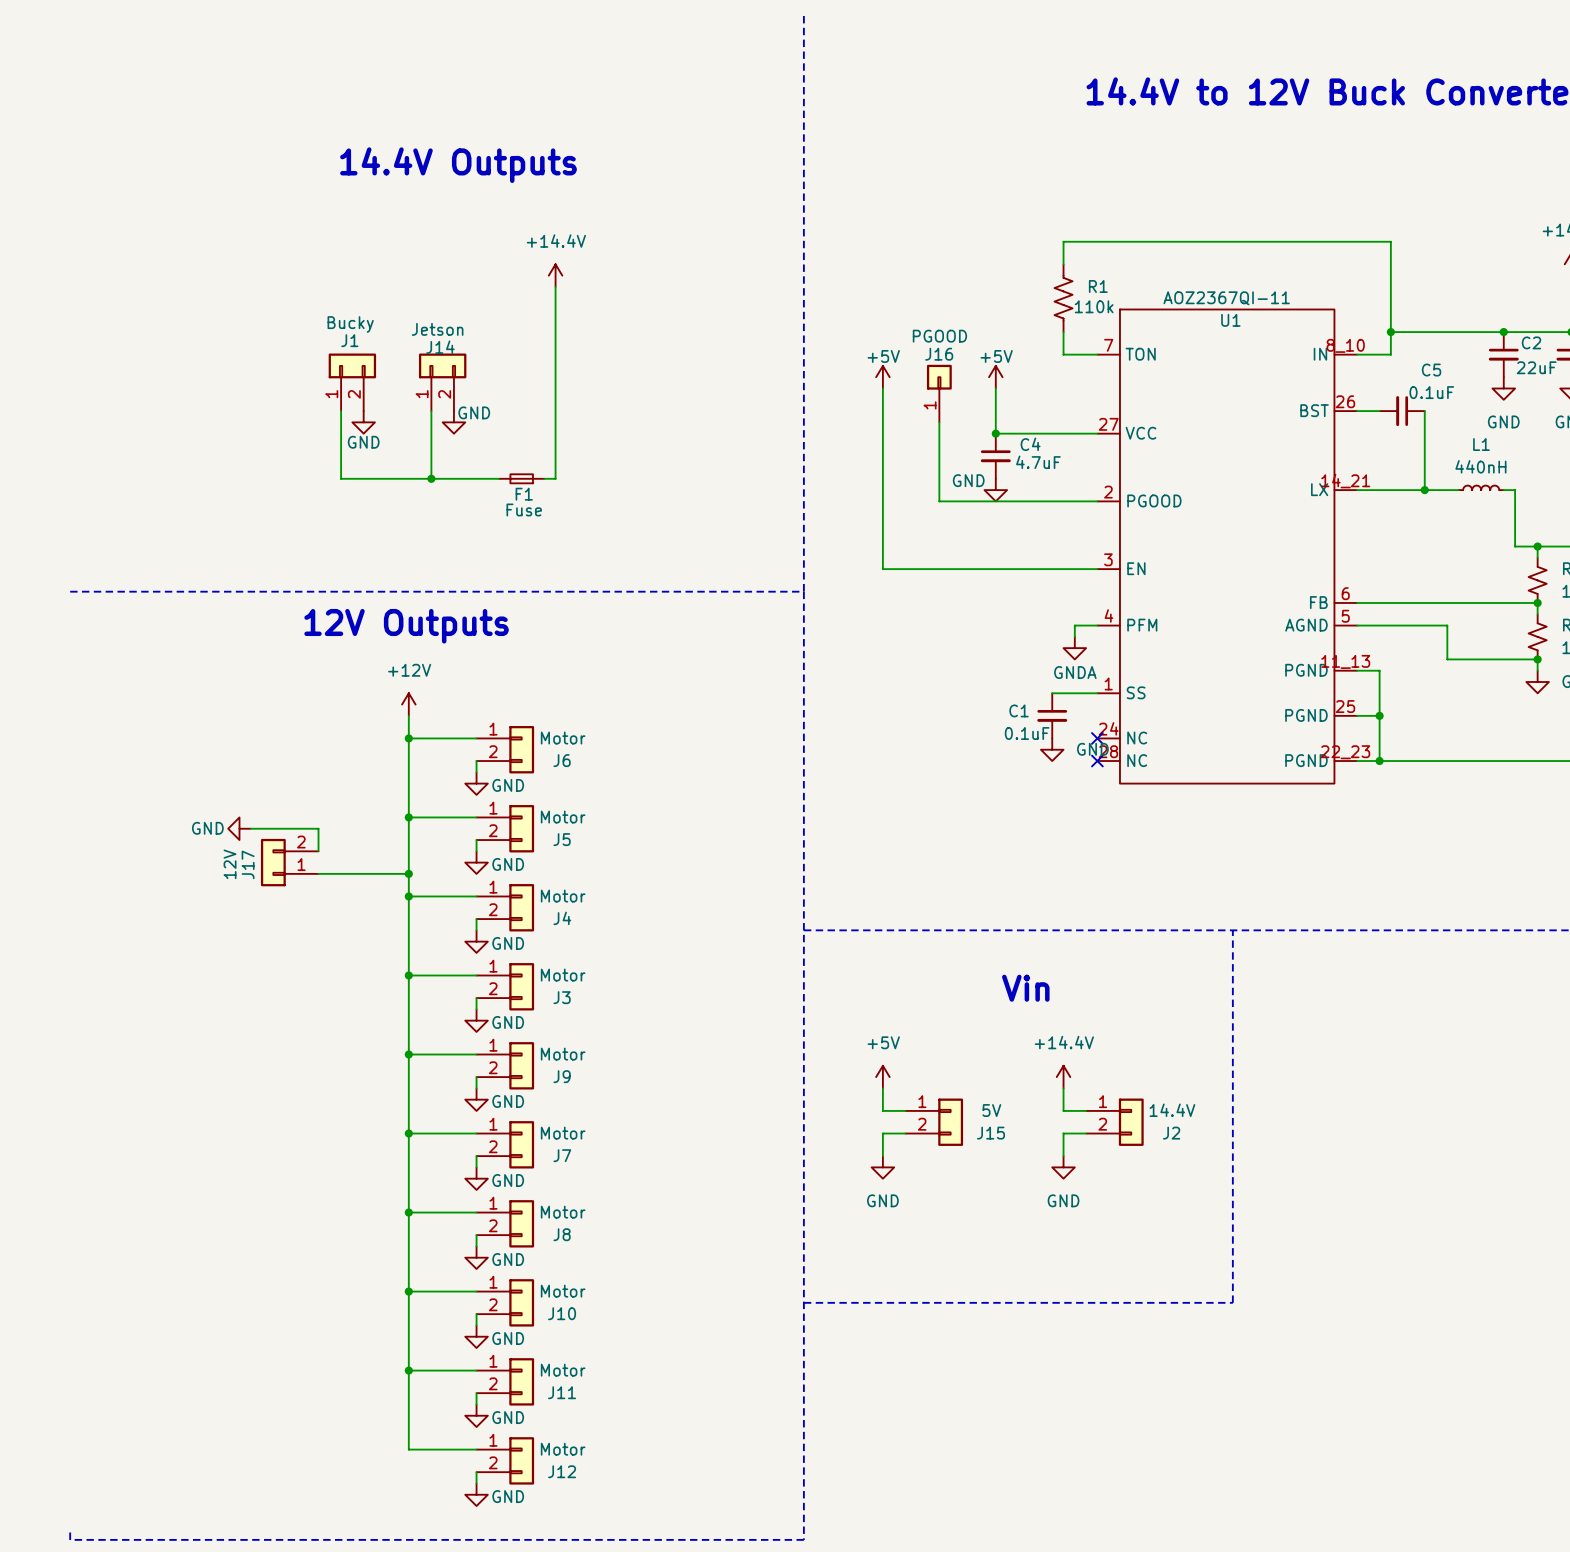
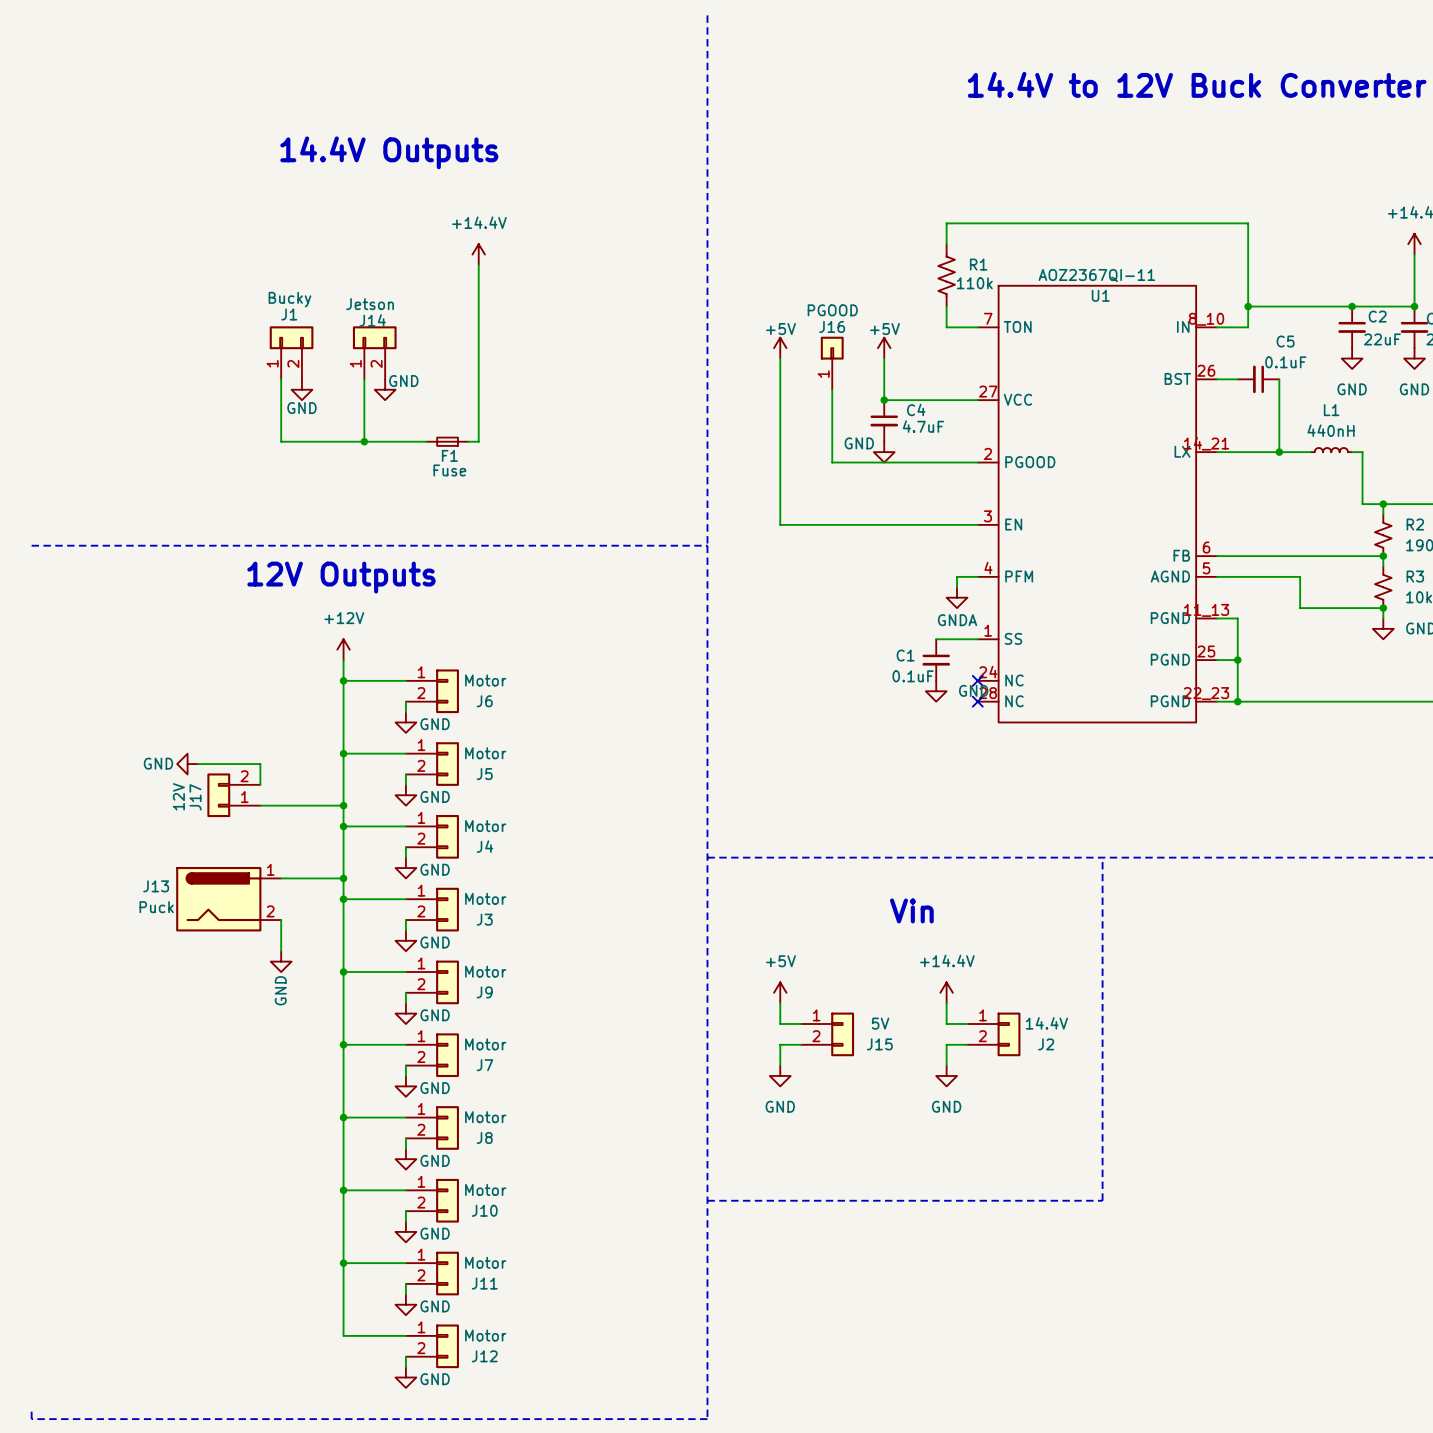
wire: none -> (281, 878) (343, 878)
junction: none -> (343, 878)
J13: none -> Puck (228, 899)
wire: none -> (281, 920) (281, 951)
power symbol: none -> GND (281, 961)

